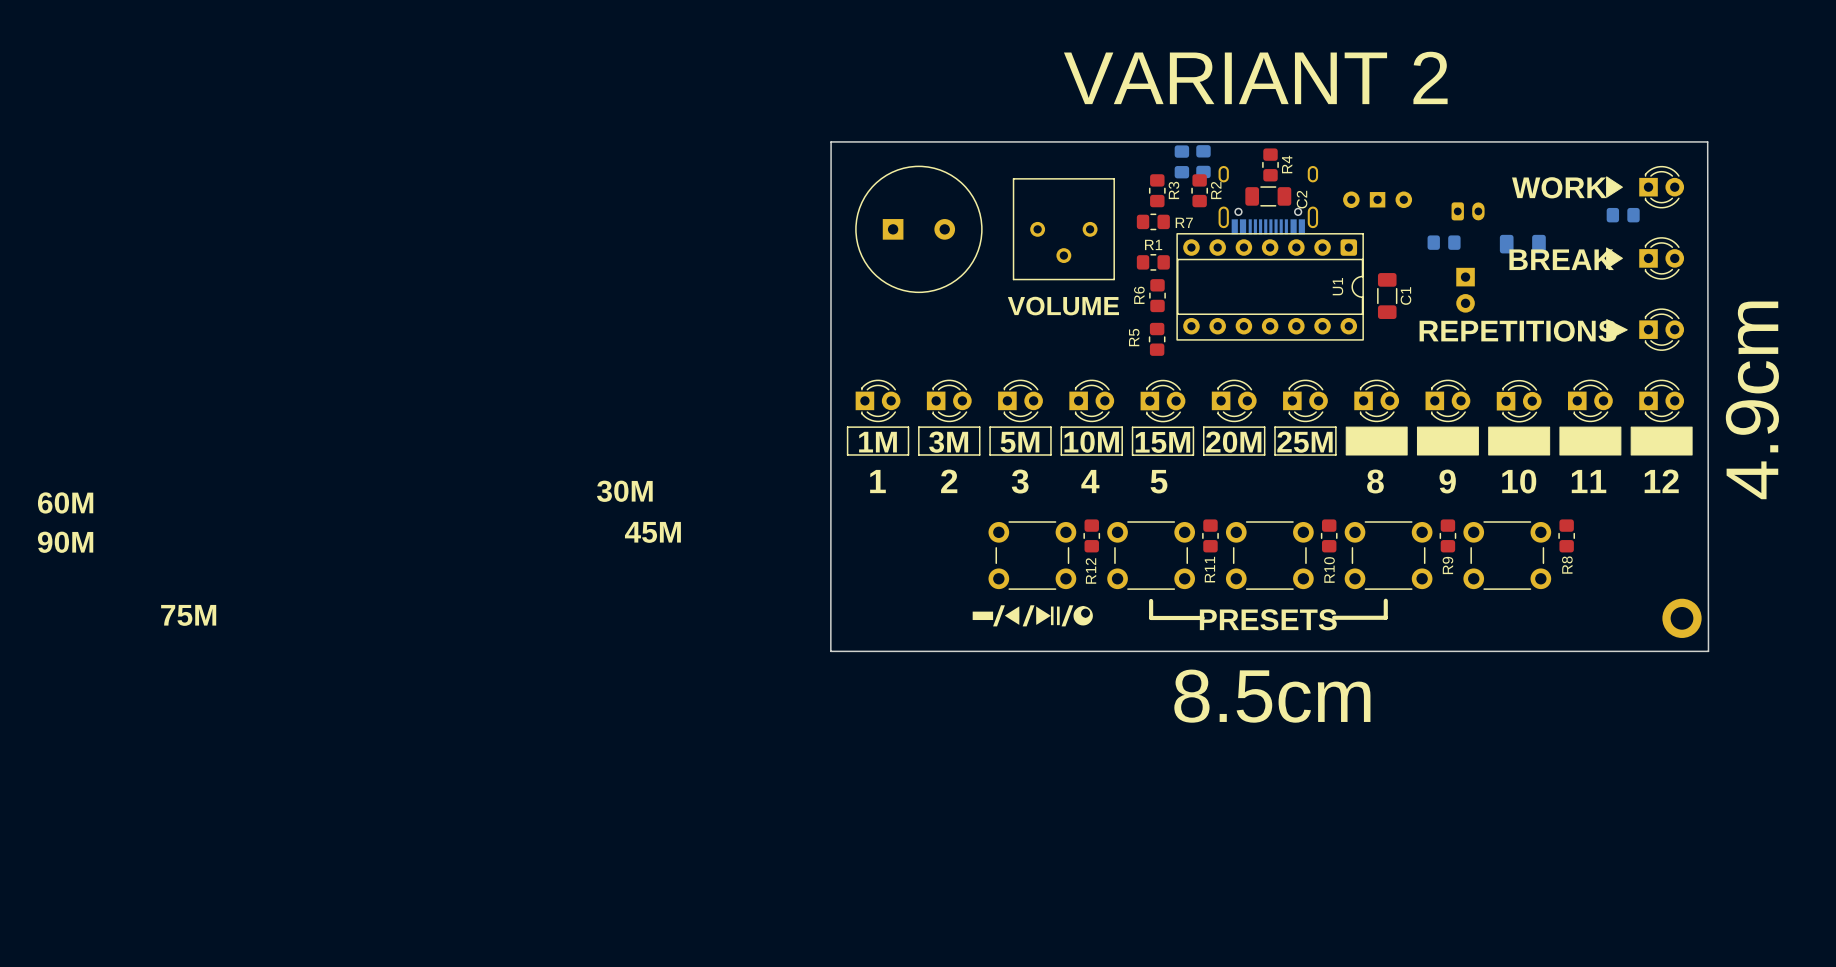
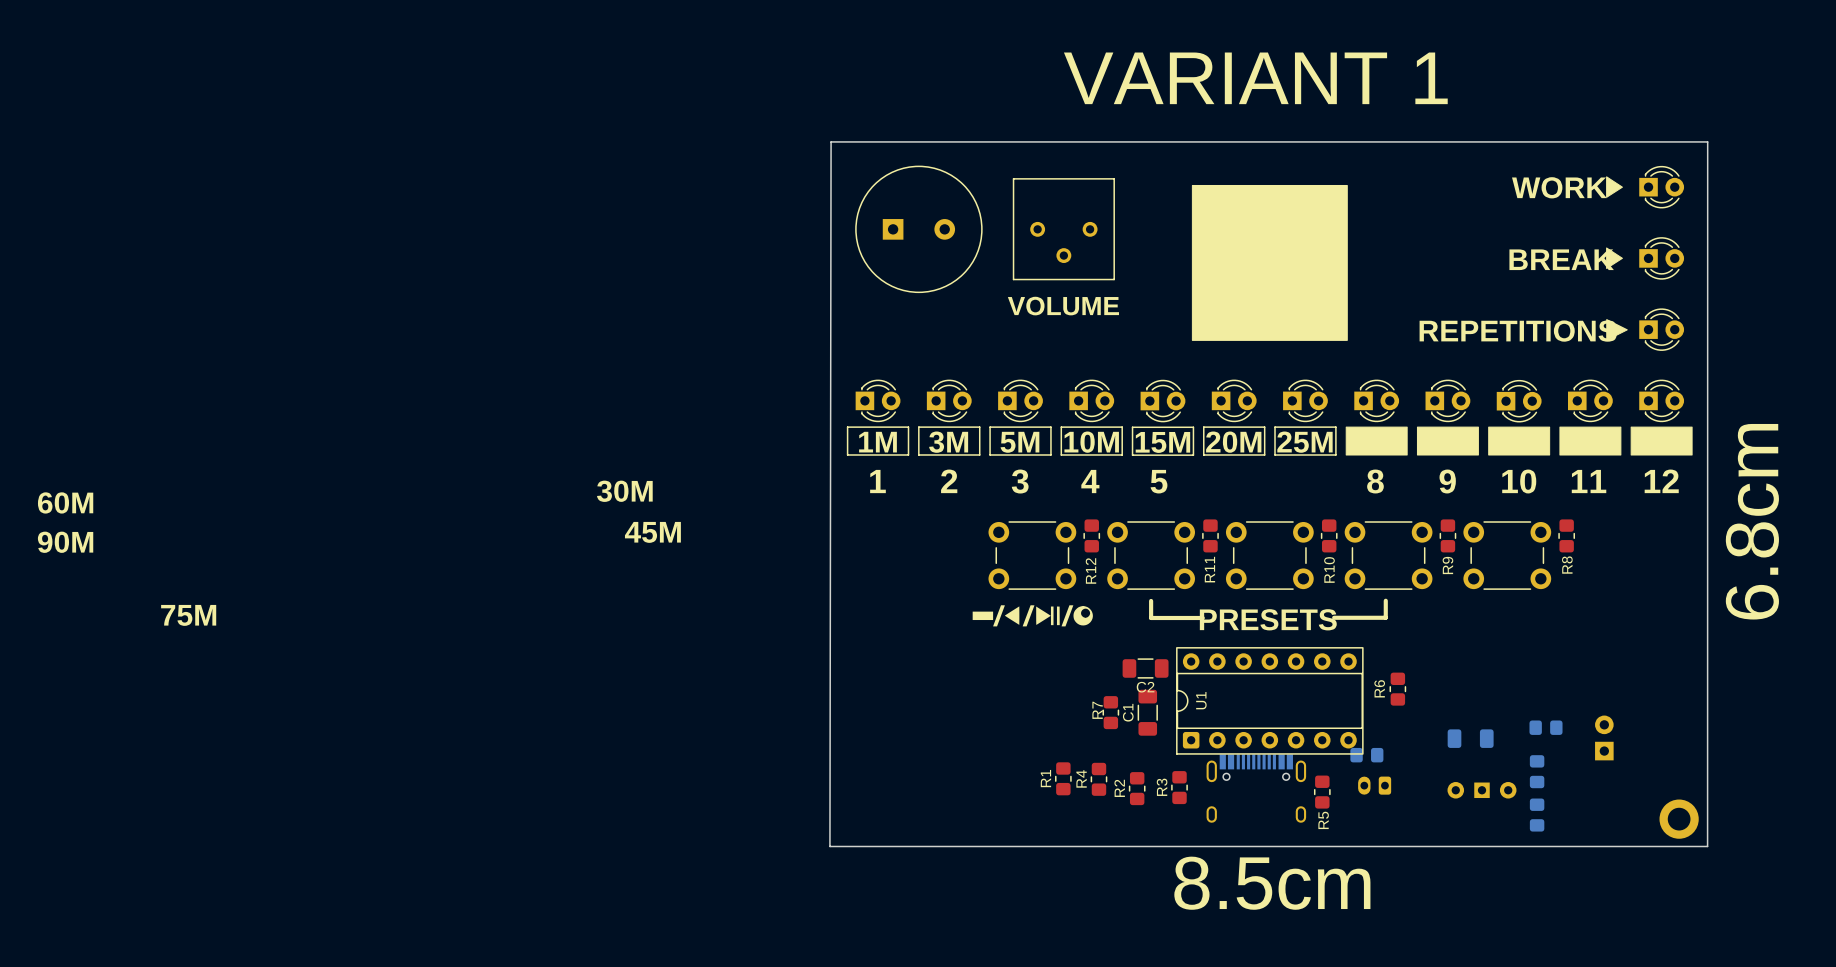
text: VARIANT 2 (1255, 77) -> VARIANT 1 (1255, 78)
board edge: (831, 141) (830, 651) (1708, 651) (1707, 141) -> (831, 141) (829, 846) (1707, 846) (1707, 141)
part: (1181, 161) -> none
part: (1203, 161) -> none
R4 position: (1270, 164) -> (1098, 779)
R4 name position: R4 (1287, 164) -> R4 (1081, 778)
drawing: none -> [1191, 184, 1348, 341]
R3 position: (1157, 190) -> (1179, 787)
R3 name position: R3 (1173, 190) -> R3 (1162, 787)
R2 position: (1199, 190) -> (1137, 788)
R2 name position: R2 (1216, 190) -> R2 (1119, 788)
C2 position: (1268, 196) -> (1145, 668)
C2 name rotation: 0° (1302, 199) -> 90° clockwise (1145, 687)
C2 name position: C2 (1302, 199) -> C2 (1145, 687)
part: (1377, 199) -> none
part: (1268, 200) -> none
part: (1468, 211) -> none
part: (1623, 215) -> none
R7 rotation: 0° (1153, 221) -> 90° clockwise (1110, 712)
R7 position: (1153, 221) -> (1110, 712)
R7 name position: R7 (1184, 222) -> R7 (1097, 710)
part: (1444, 242) -> none
R1 name position: R1 (1153, 244) -> R1 (1045, 778)
part: (1522, 244) -> none
R1 rotation: 0° (1153, 262) -> 90° clockwise (1063, 778)
R1 position: (1153, 262) -> (1063, 778)
U1 rotation: 0° (1270, 286) -> 180° (1269, 700)
U1 position: (1270, 286) -> (1269, 700)
part: (1465, 290) -> none
R6 position: (1157, 295) -> (1397, 689)
C1 position: (1387, 296) -> (1147, 712)
C1 name position: C1 (1405, 296) -> C1 (1128, 712)
R5 name position: R5 (1134, 337) -> R5 (1323, 820)
R5 position: (1157, 339) -> (1322, 792)
text: 4.9cm (1752, 400) -> none
text: none -> 6.8cm (1752, 521)
part position: (1682, 618) -> (1679, 819)
text position: 8.5cm (1272, 696) -> 8.5cm (1272, 883)
part: none -> (1546, 727)
part: none -> (1604, 737)
part: none -> (1470, 738)
part: none -> (1366, 755)
part: none -> (1537, 771)
part: none -> (1374, 785)
part: none -> (1256, 788)
part: none -> (1482, 790)
part: none -> (1537, 815)

